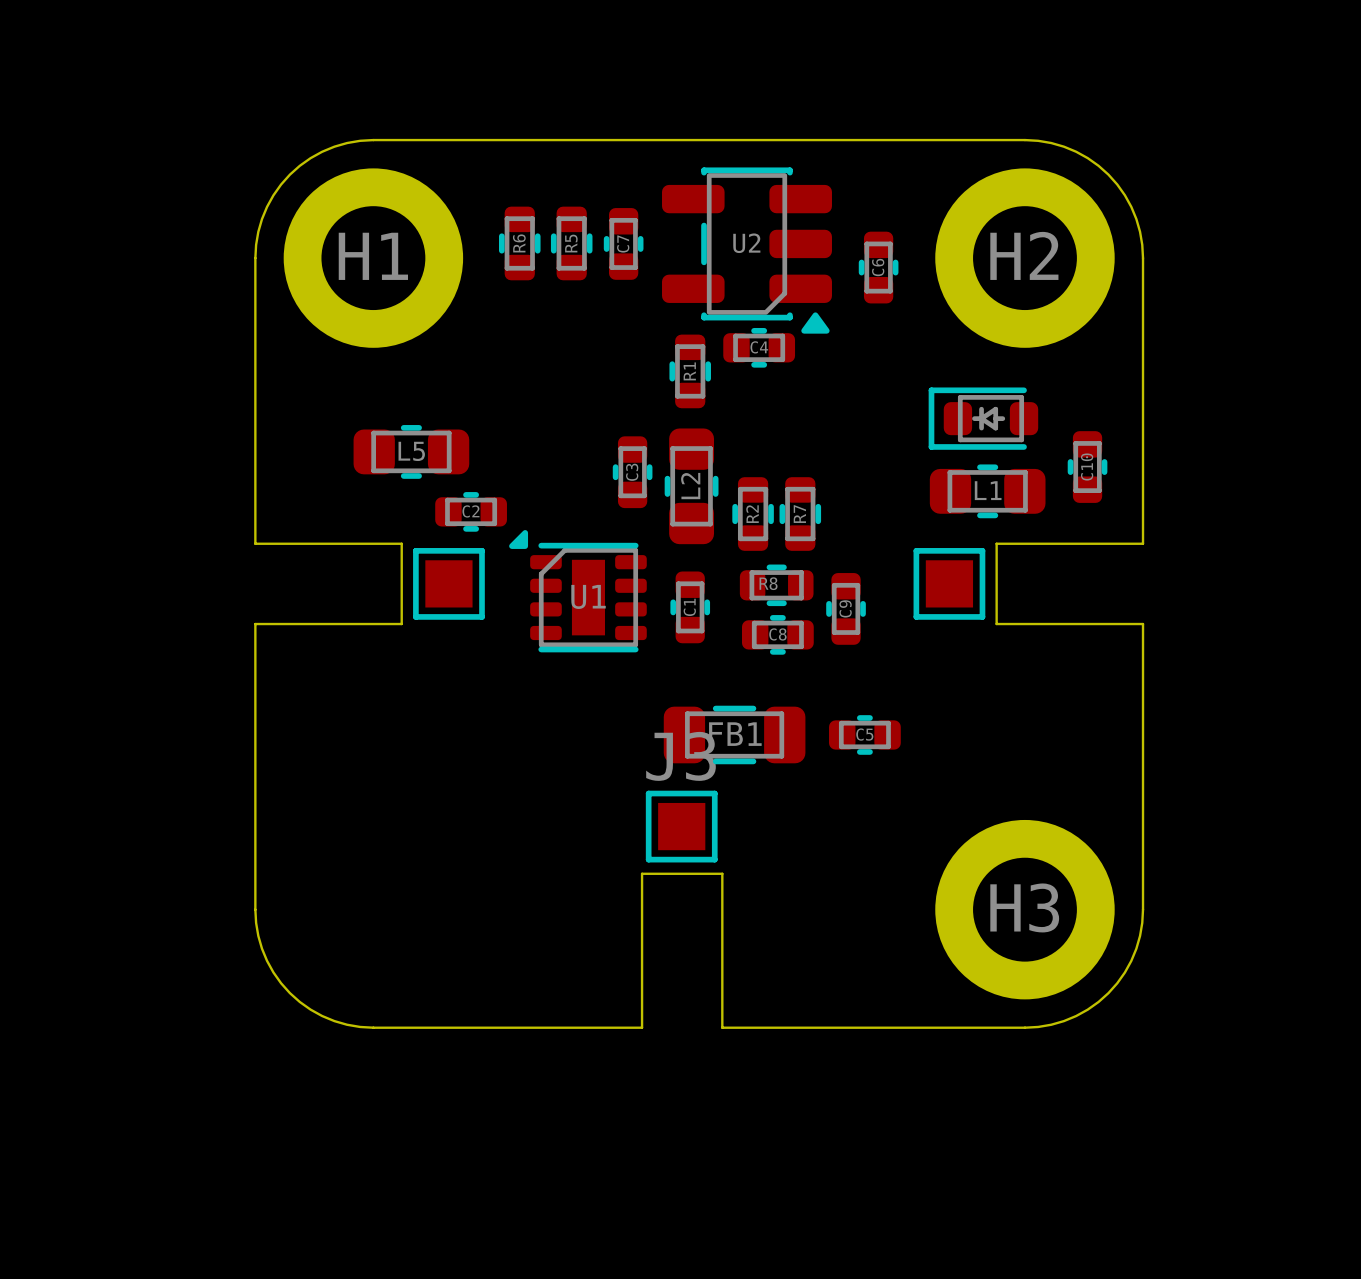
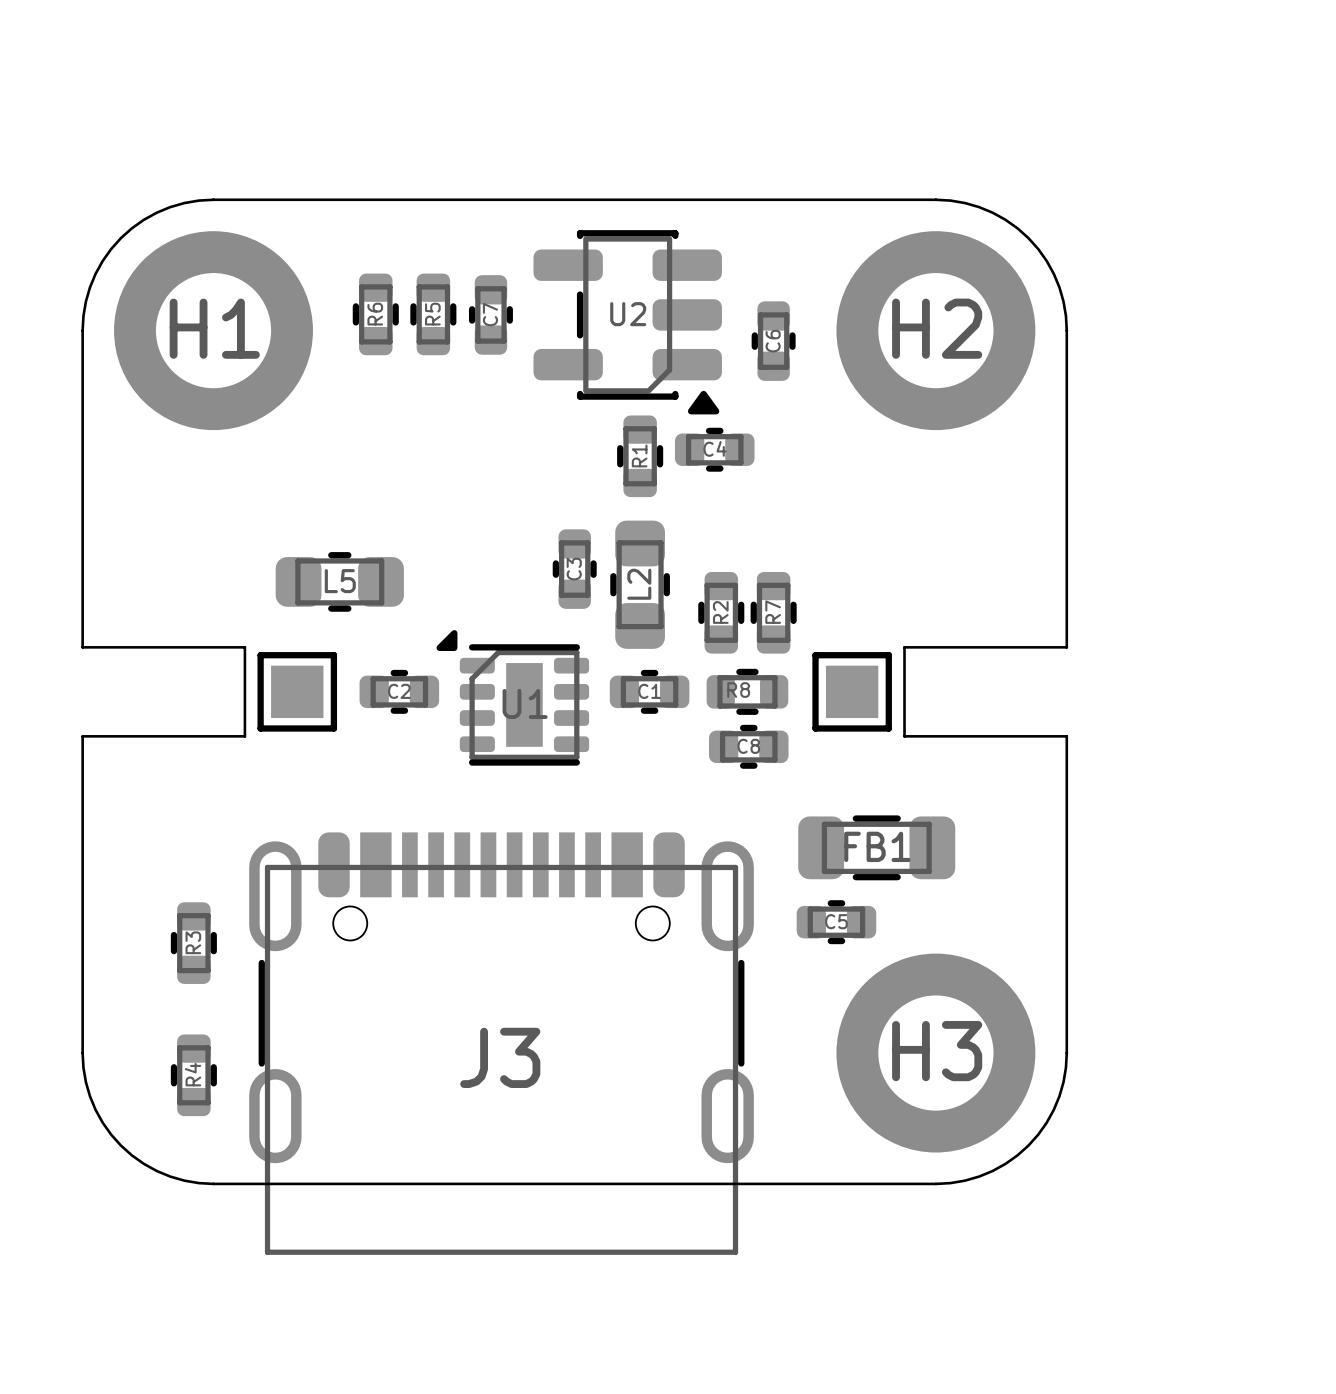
C4 position: (759, 347) -> (714, 449)
R1 position: (690, 371) -> (640, 456)
part: (983, 418) -> none
L5 position: (411, 451) -> (339, 581)
C10: (1087, 467) -> none
C3 position: (632, 472) -> (574, 569)
L2 position: (691, 486) -> (640, 584)
L1: (987, 491) -> none
C2 position: (471, 511) -> (399, 691)
R2 position: (753, 514) -> (721, 612)
R7 position: (800, 514) -> (773, 612)
R8 position: (776, 585) -> (747, 691)
U1 position: (577, 591) -> (512, 697)
C1 rotation: 0° (690, 607) -> 90° clockwise (649, 691)
C1 position: (690, 607) -> (649, 691)
C9: (846, 608) -> none
C8 position: (777, 634) -> (748, 746)
FB1 position: (734, 734) -> (876, 847)
C5 position: (864, 734) -> (836, 922)
J3 footprint: [645, 790, 718, 863] -> [249, 832, 754, 1255]
R3: none -> (193, 943)
R4: none -> (193, 1075)
board edge: (642, 1027) (642, 873) (722, 873) (722, 1027) -> (511, 1183) (600, 1183)

